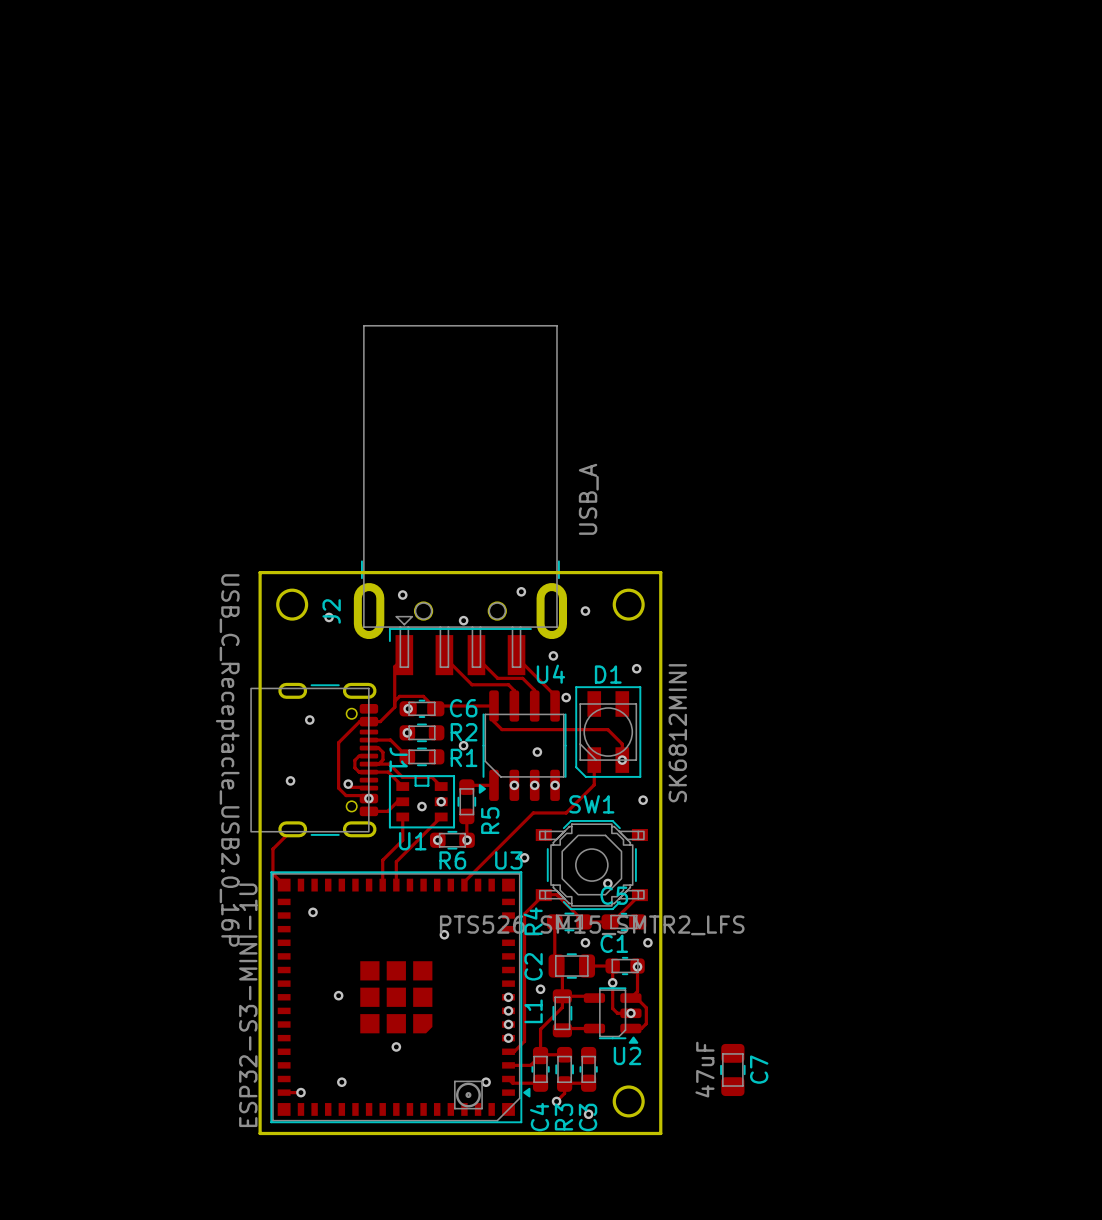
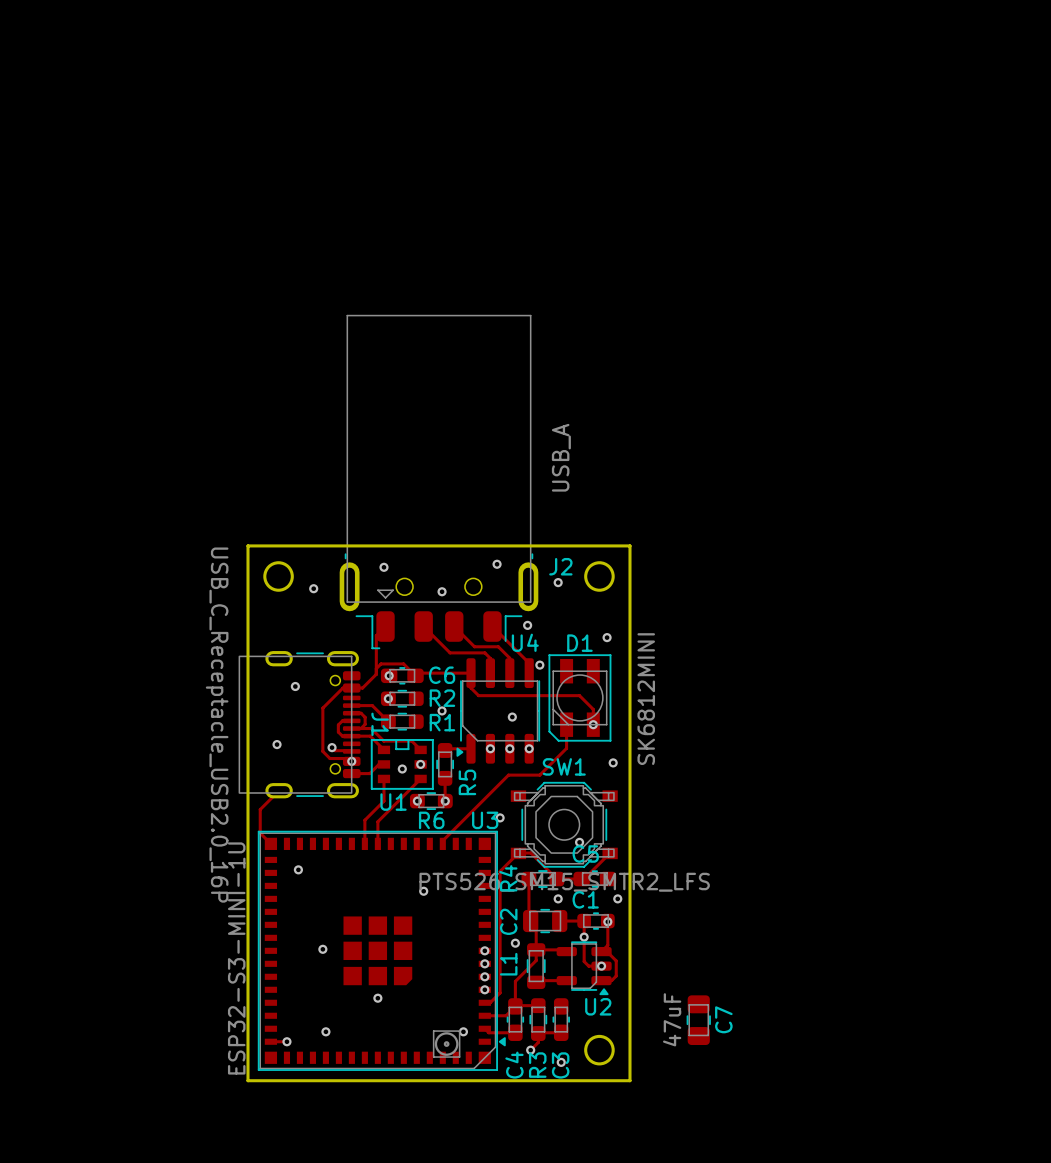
J2 footprint: [353, 324, 568, 676] -> [339, 314, 539, 650]
J2 name position: J2 (331, 611) -> J2 (560, 566)

